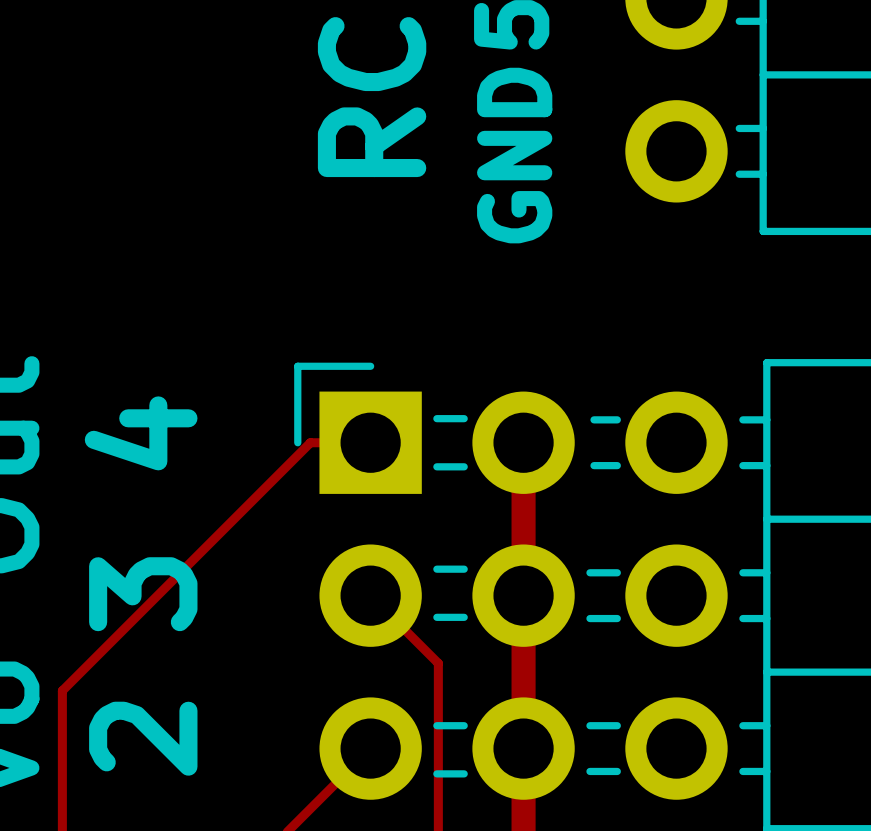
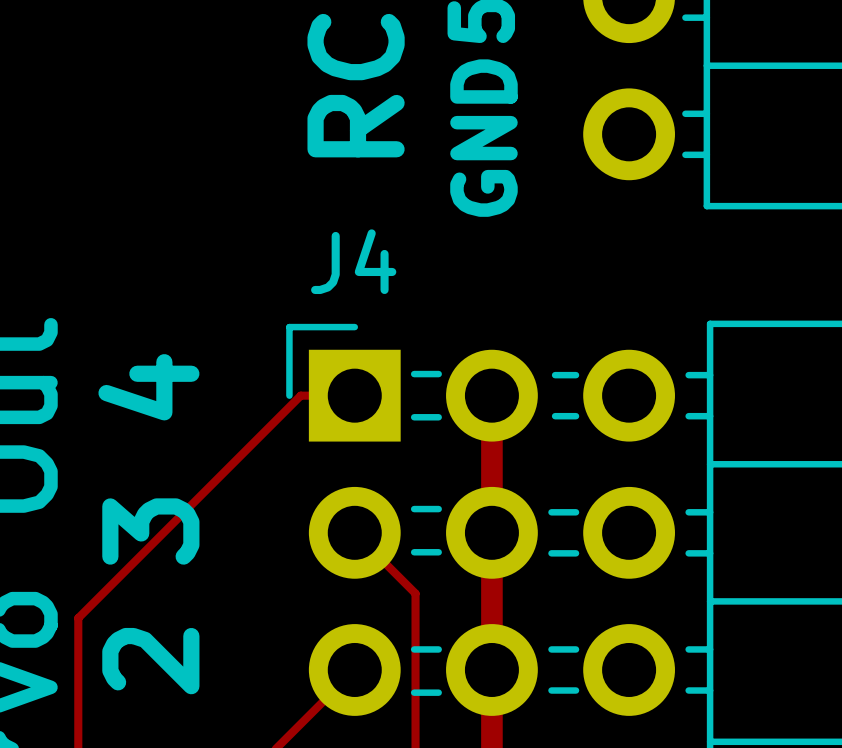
J4 name: none -> J4 (353, 261)

